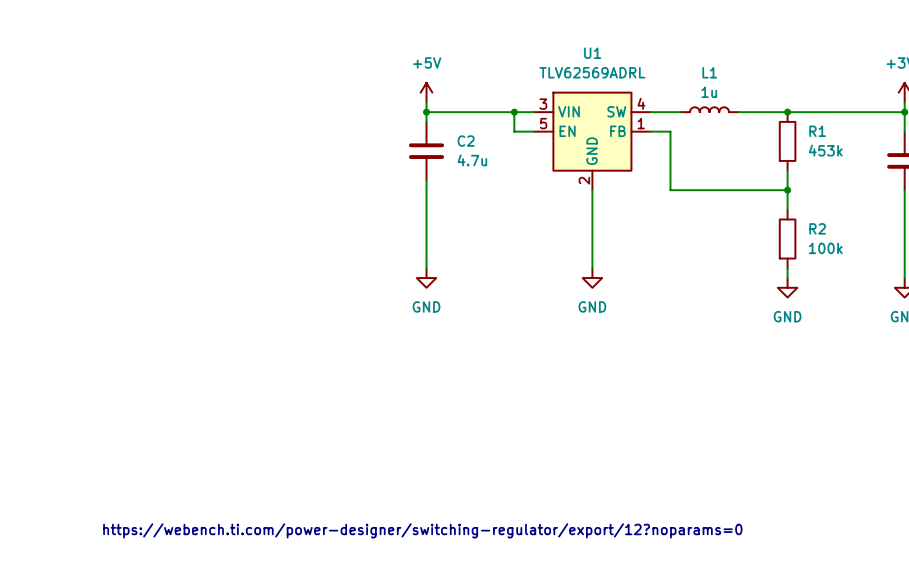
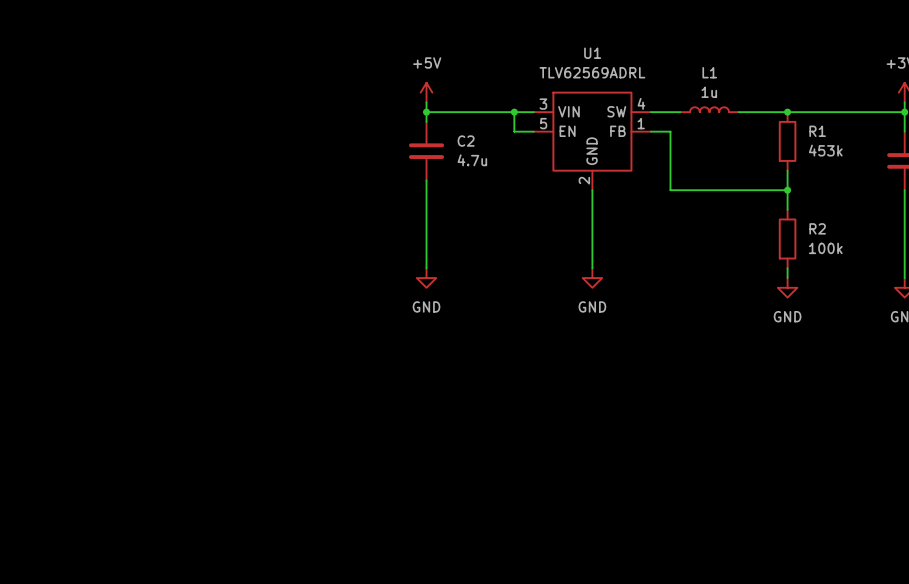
text: https://webench.ti.com/power-designer/switching-regulator/export/12?noparams=0 (422, 530) -> none

